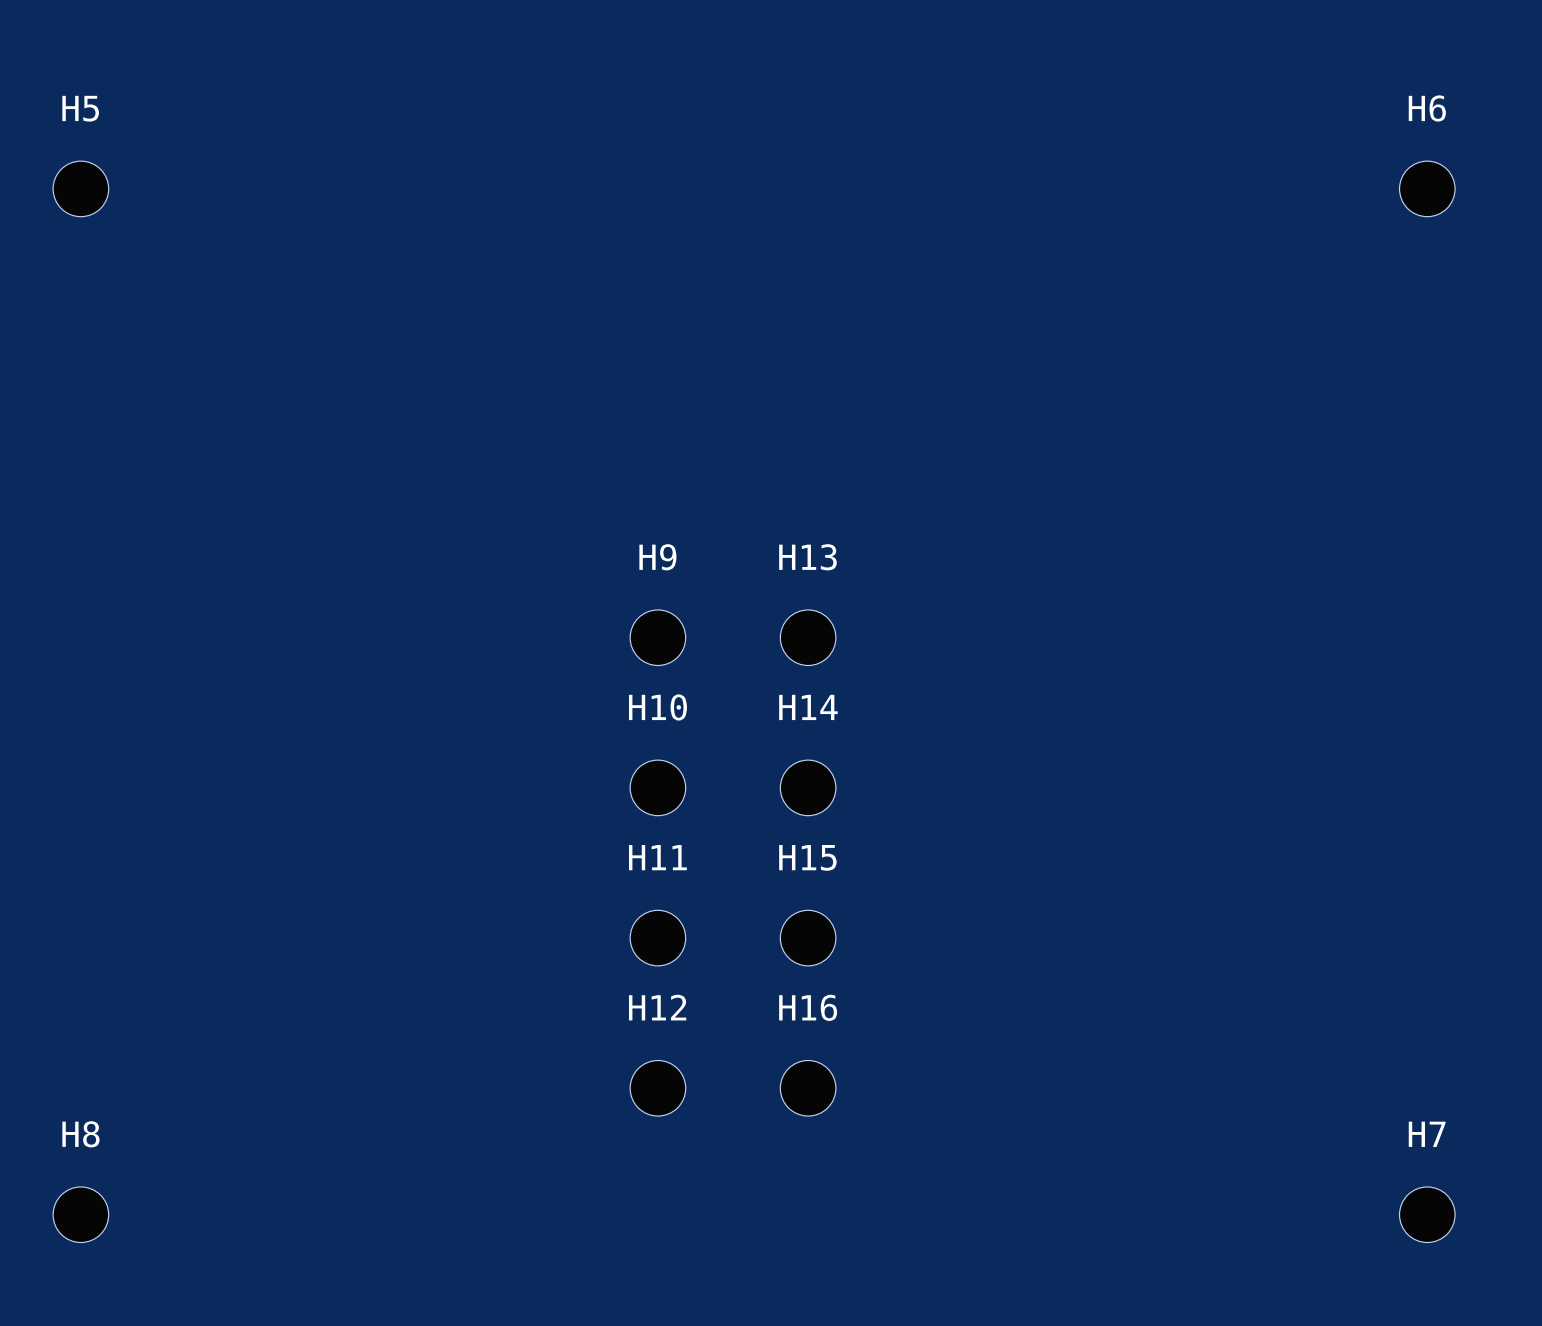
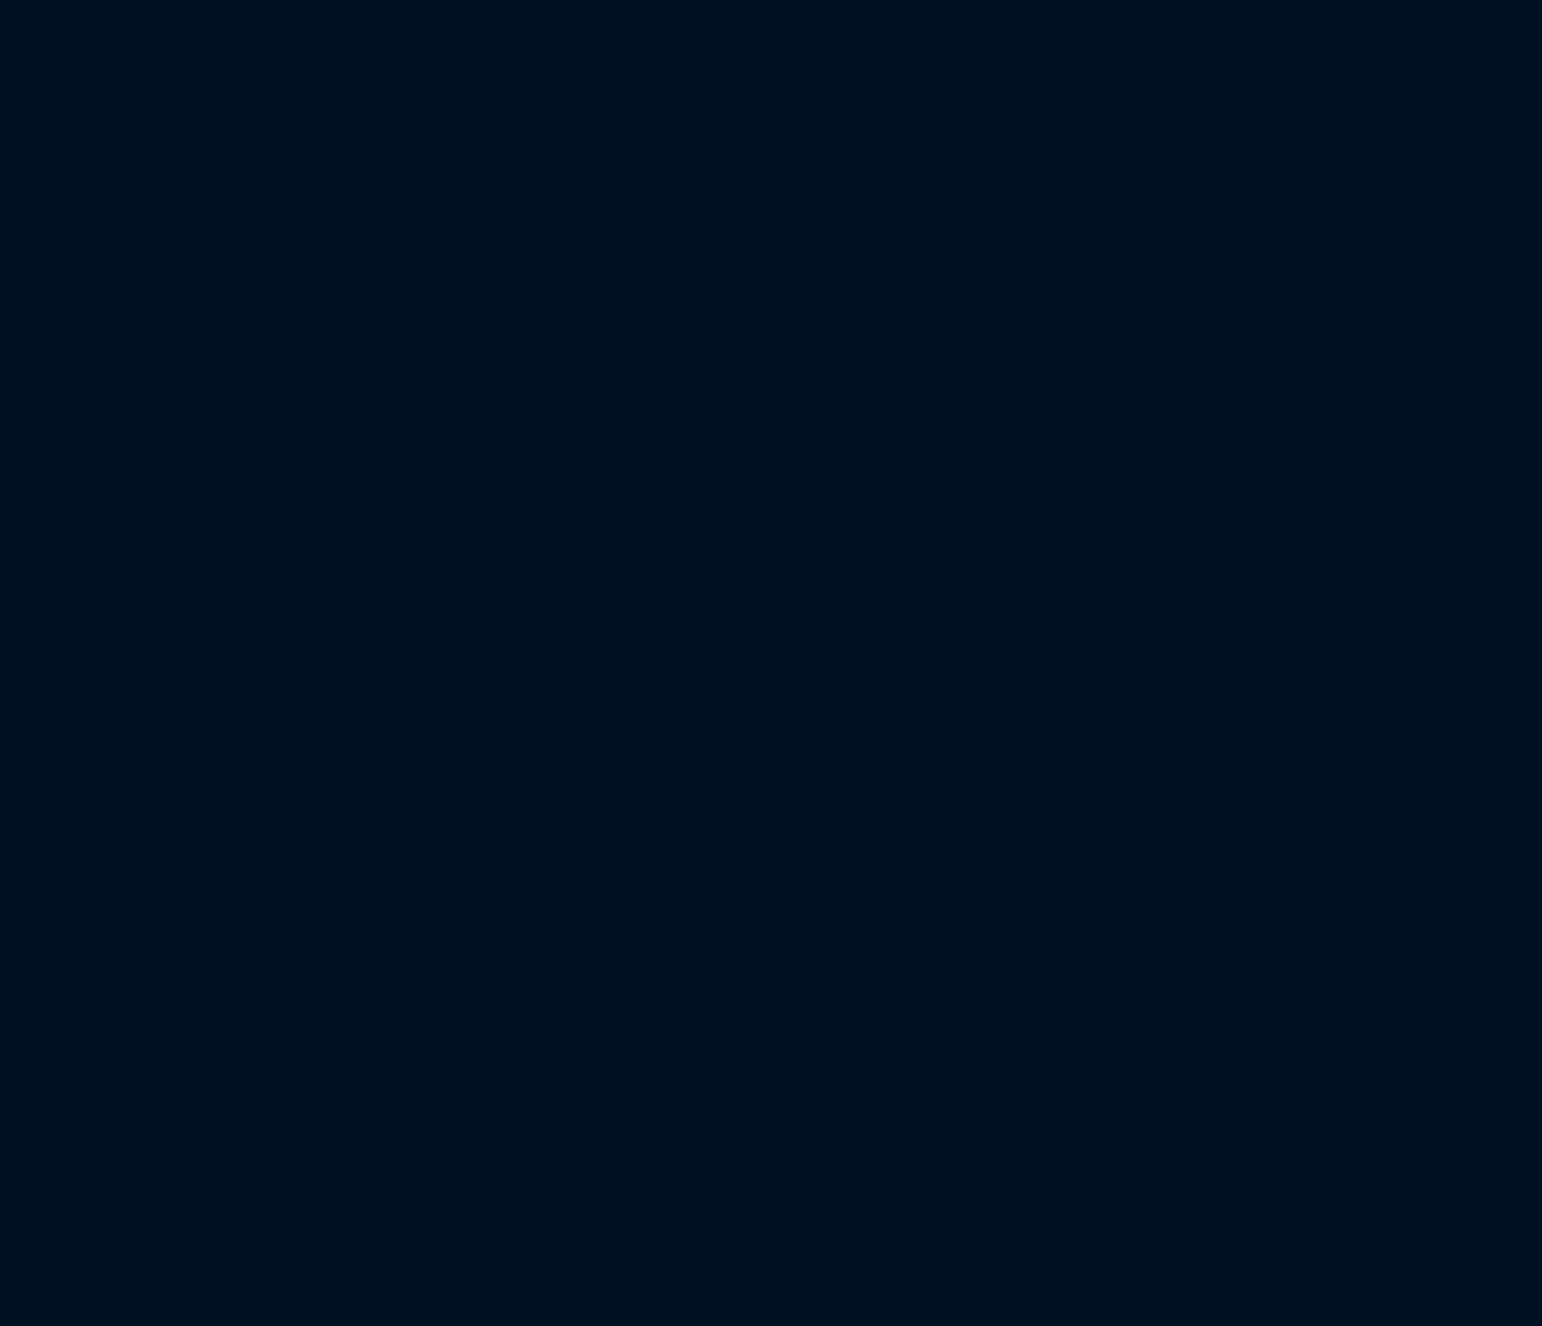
H5: (80, 188) -> none
H6: (1427, 188) -> none
H9: (657, 637) -> none
H13: (808, 637) -> none
H10: (657, 787) -> none
H14: (808, 787) -> none
H11: (657, 938) -> none
H15: (808, 938) -> none
H12: (657, 1088) -> none
H16: (808, 1088) -> none
H8: (80, 1214) -> none
H7: (1427, 1214) -> none

